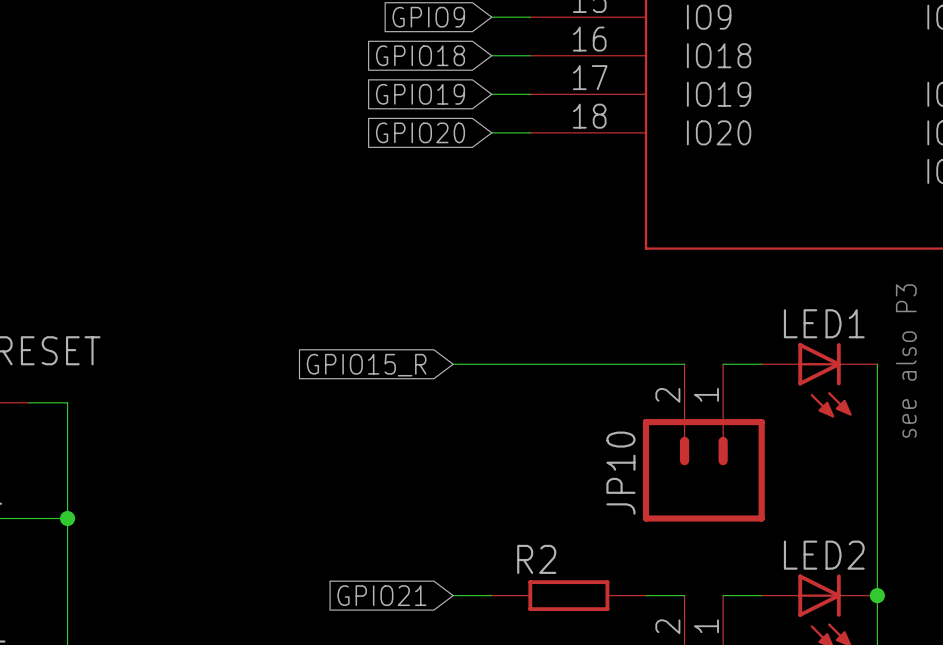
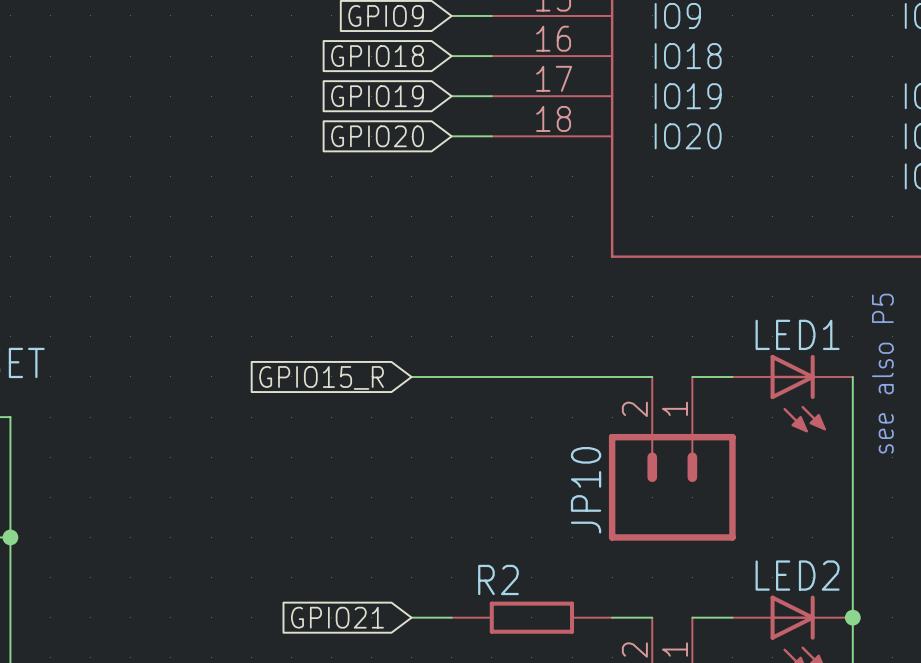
text: see also P3 (906, 361) -> see also P5 (882, 373)

